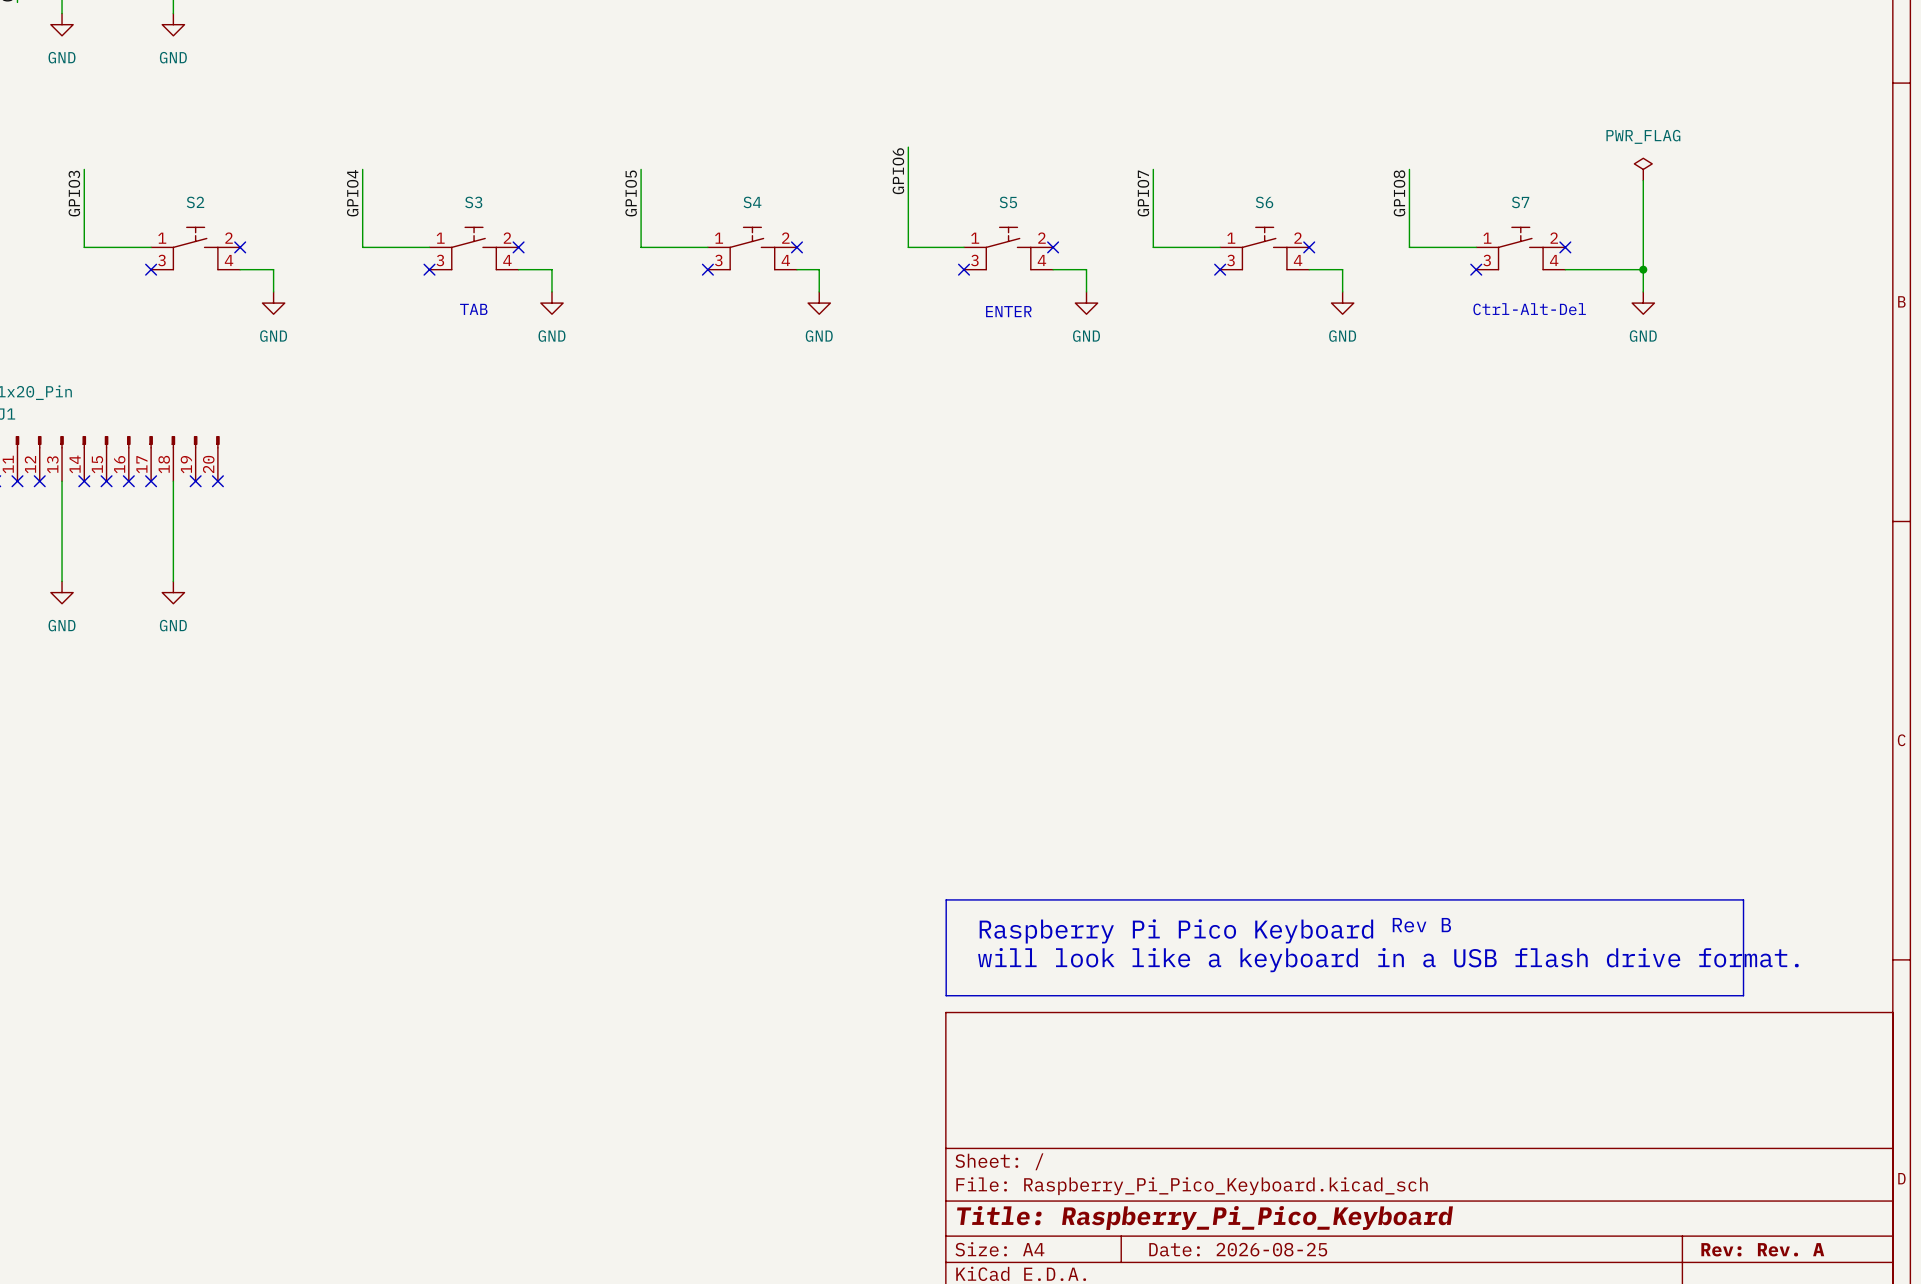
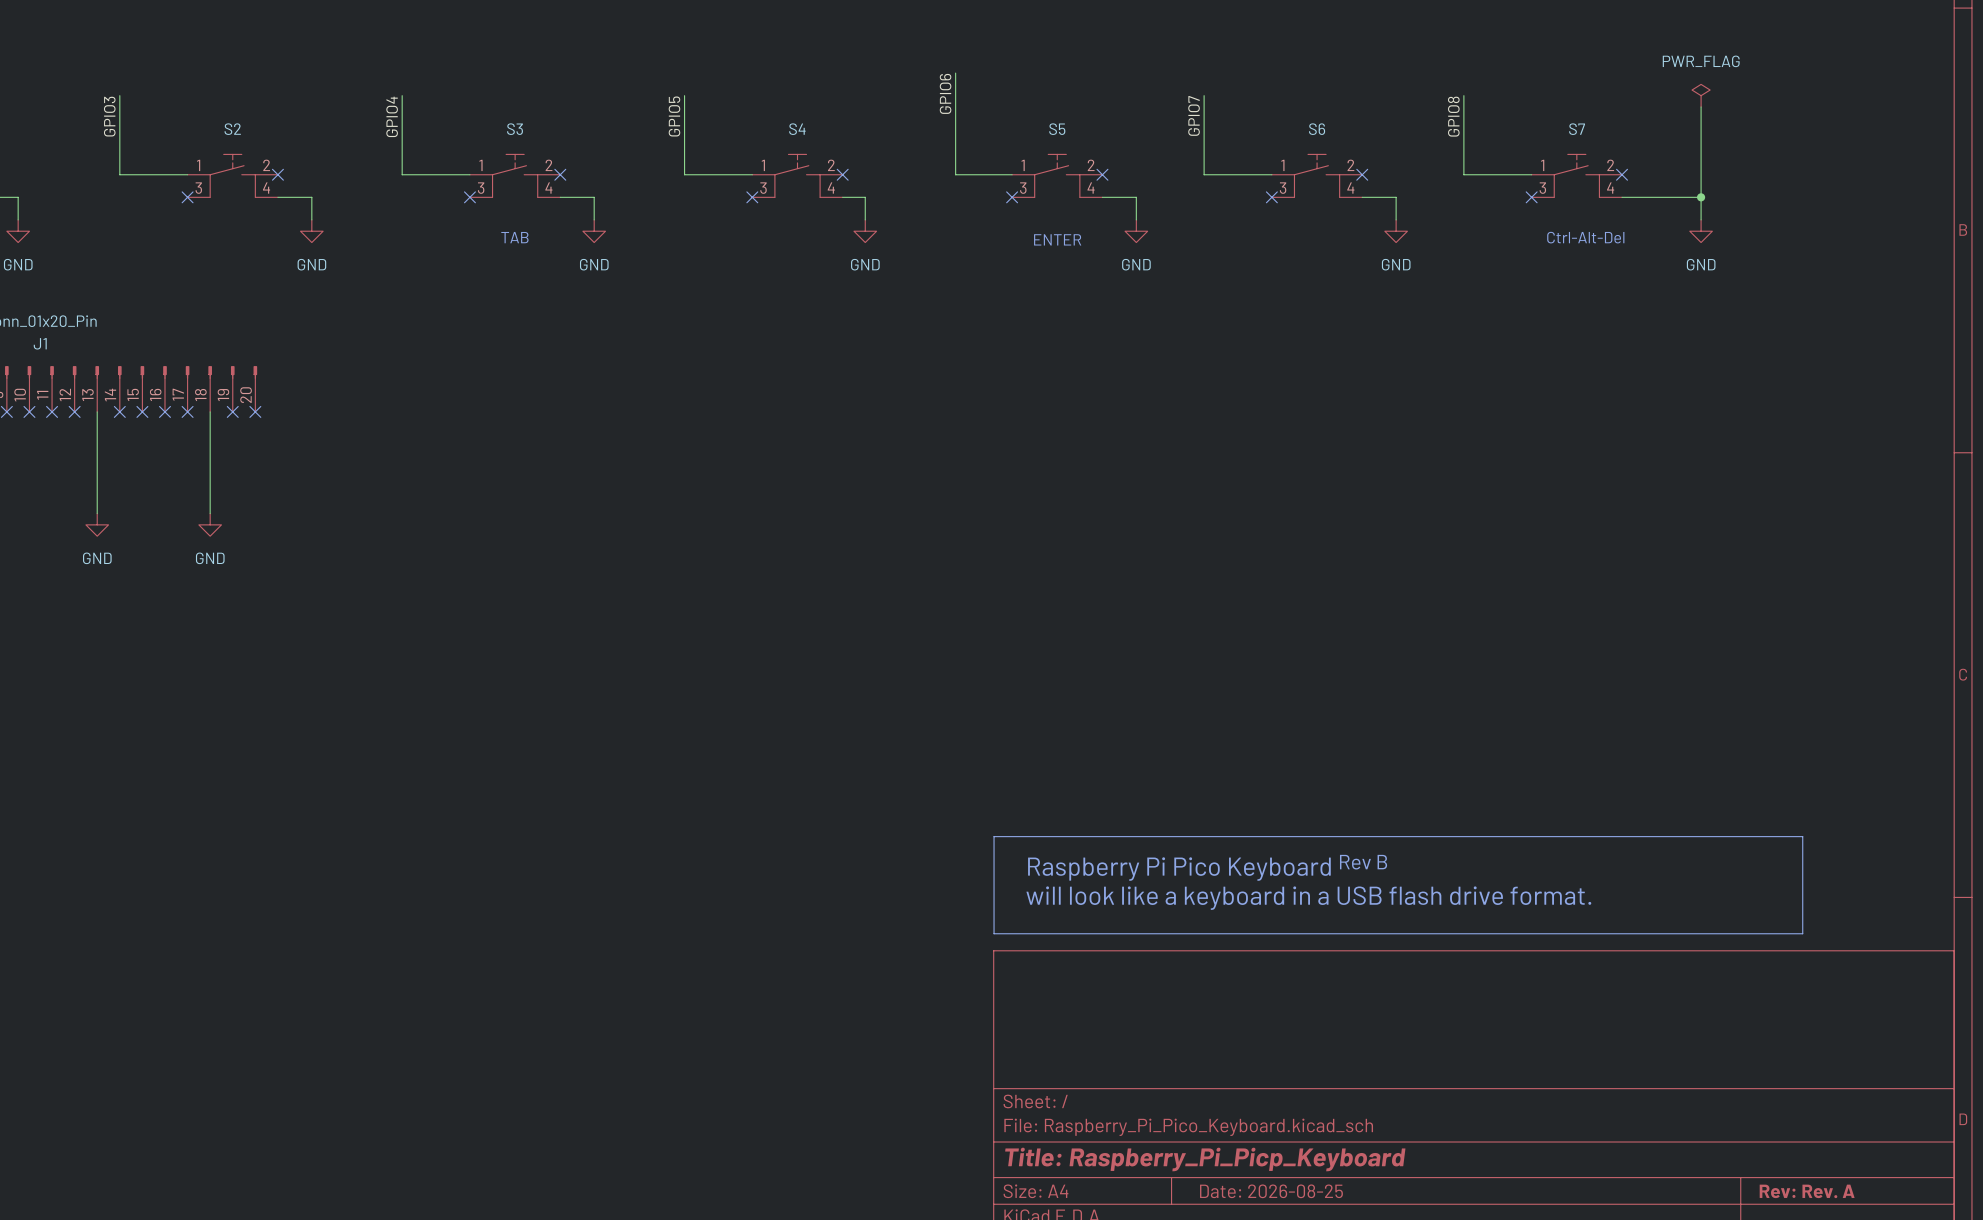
title block: Title: Raspberry_Pi_Pico_Keyboard (1204, 1218) -> Title: Raspberry_Pi_Picp_Keyboard (1205, 1159)

